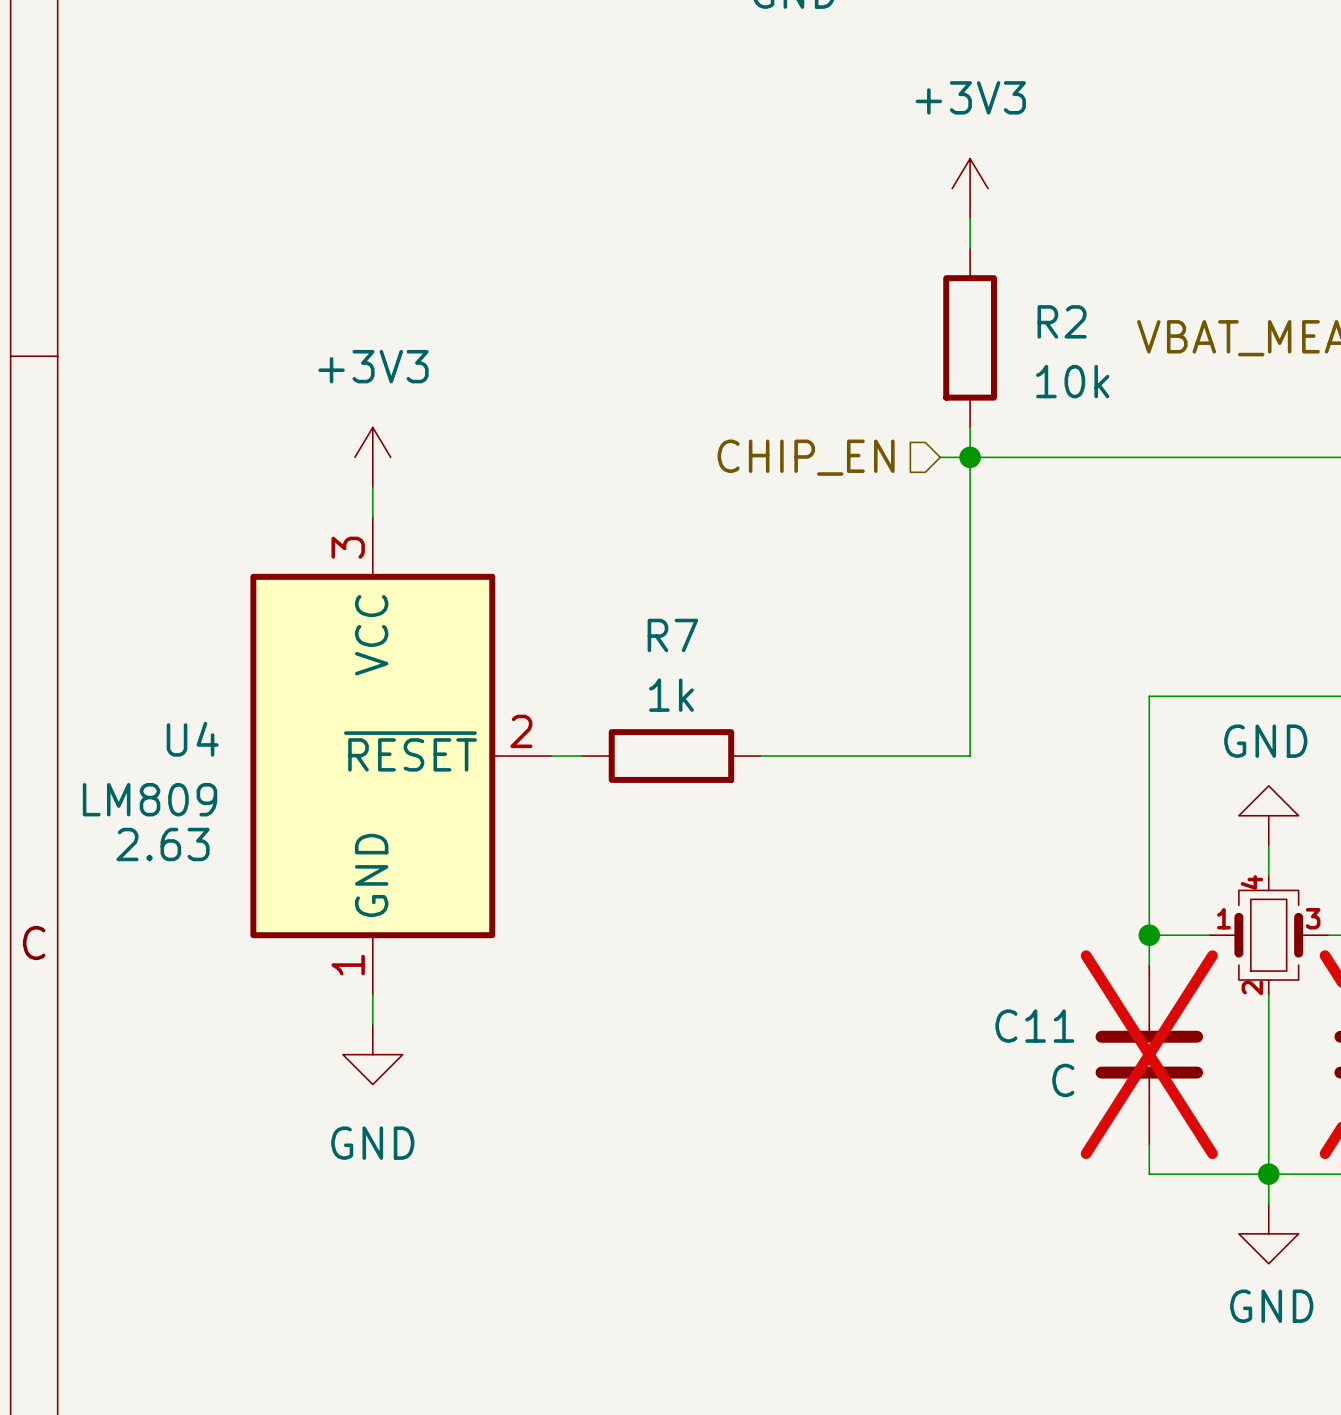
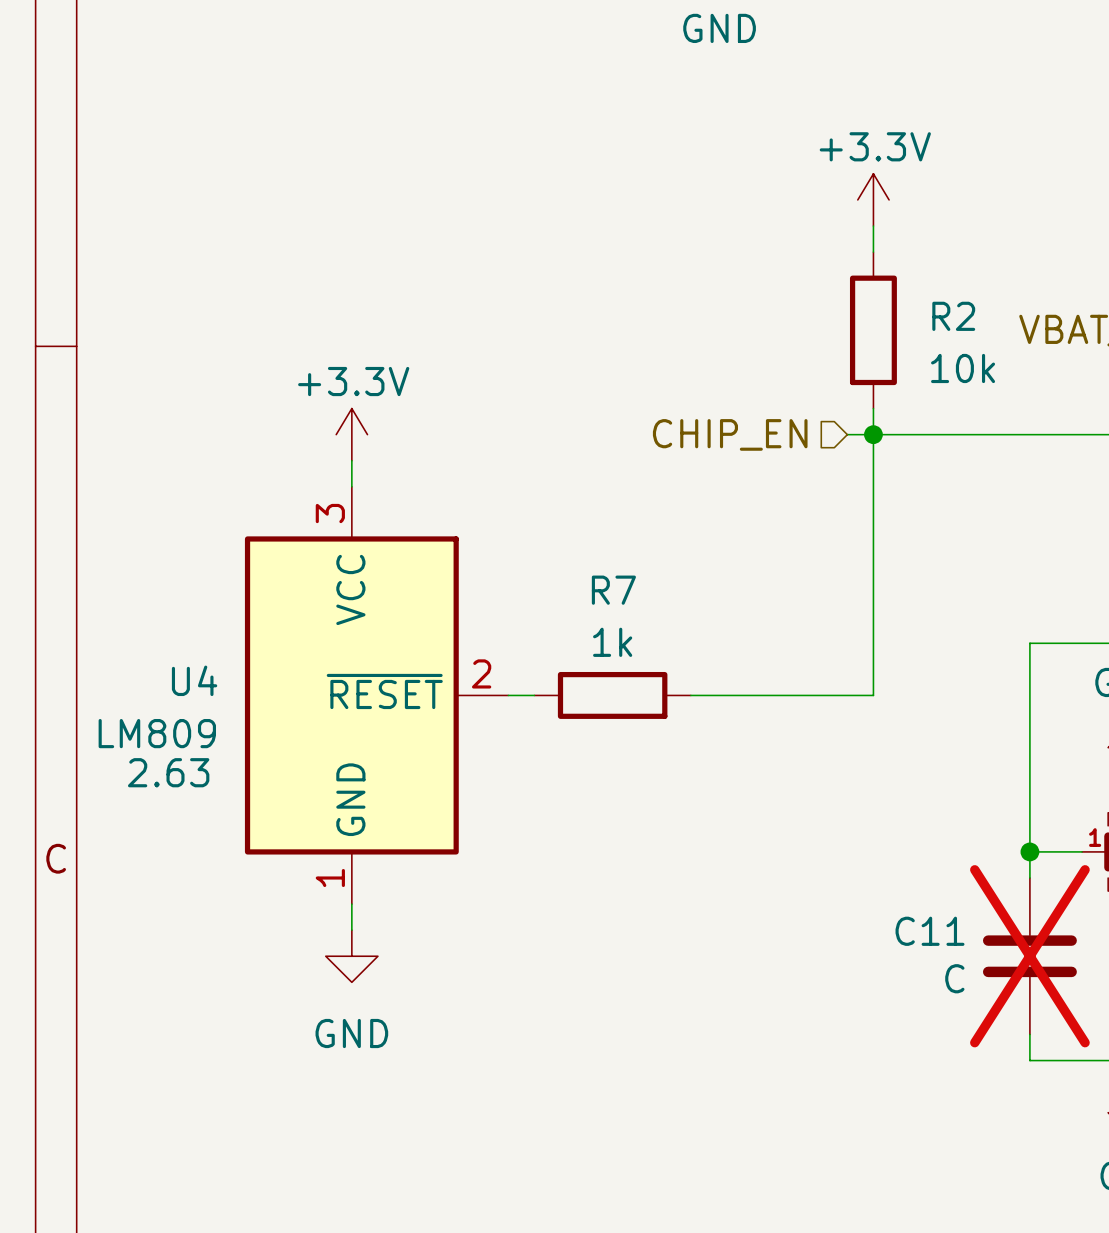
power symbol: +3V3 (970, 188) -> +3.3V (873, 199)
power symbol: +3V3 (372, 457) -> +3.3V (351, 434)

